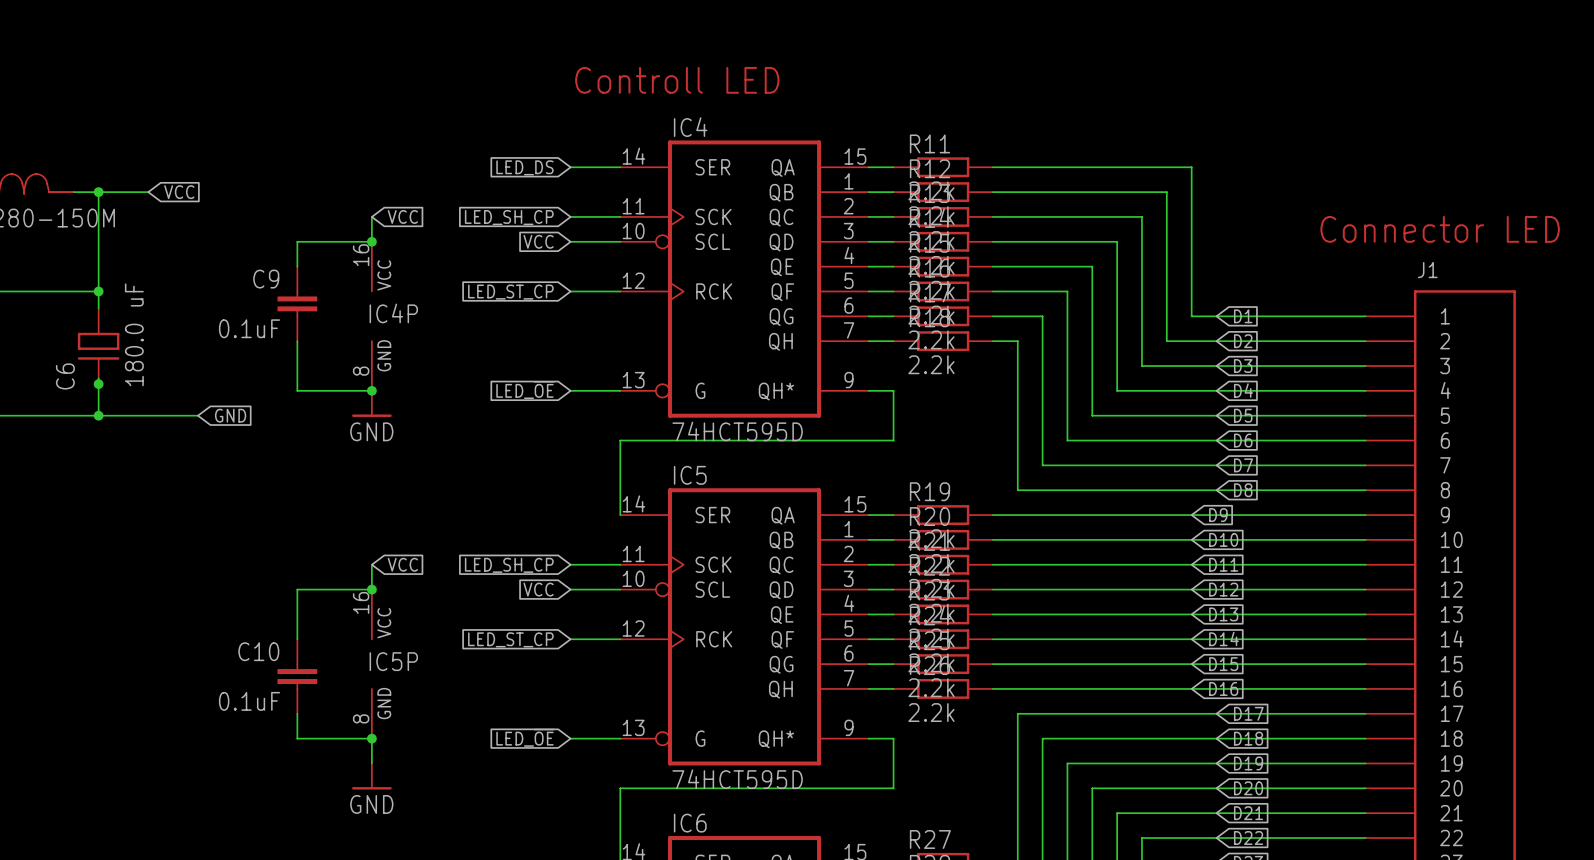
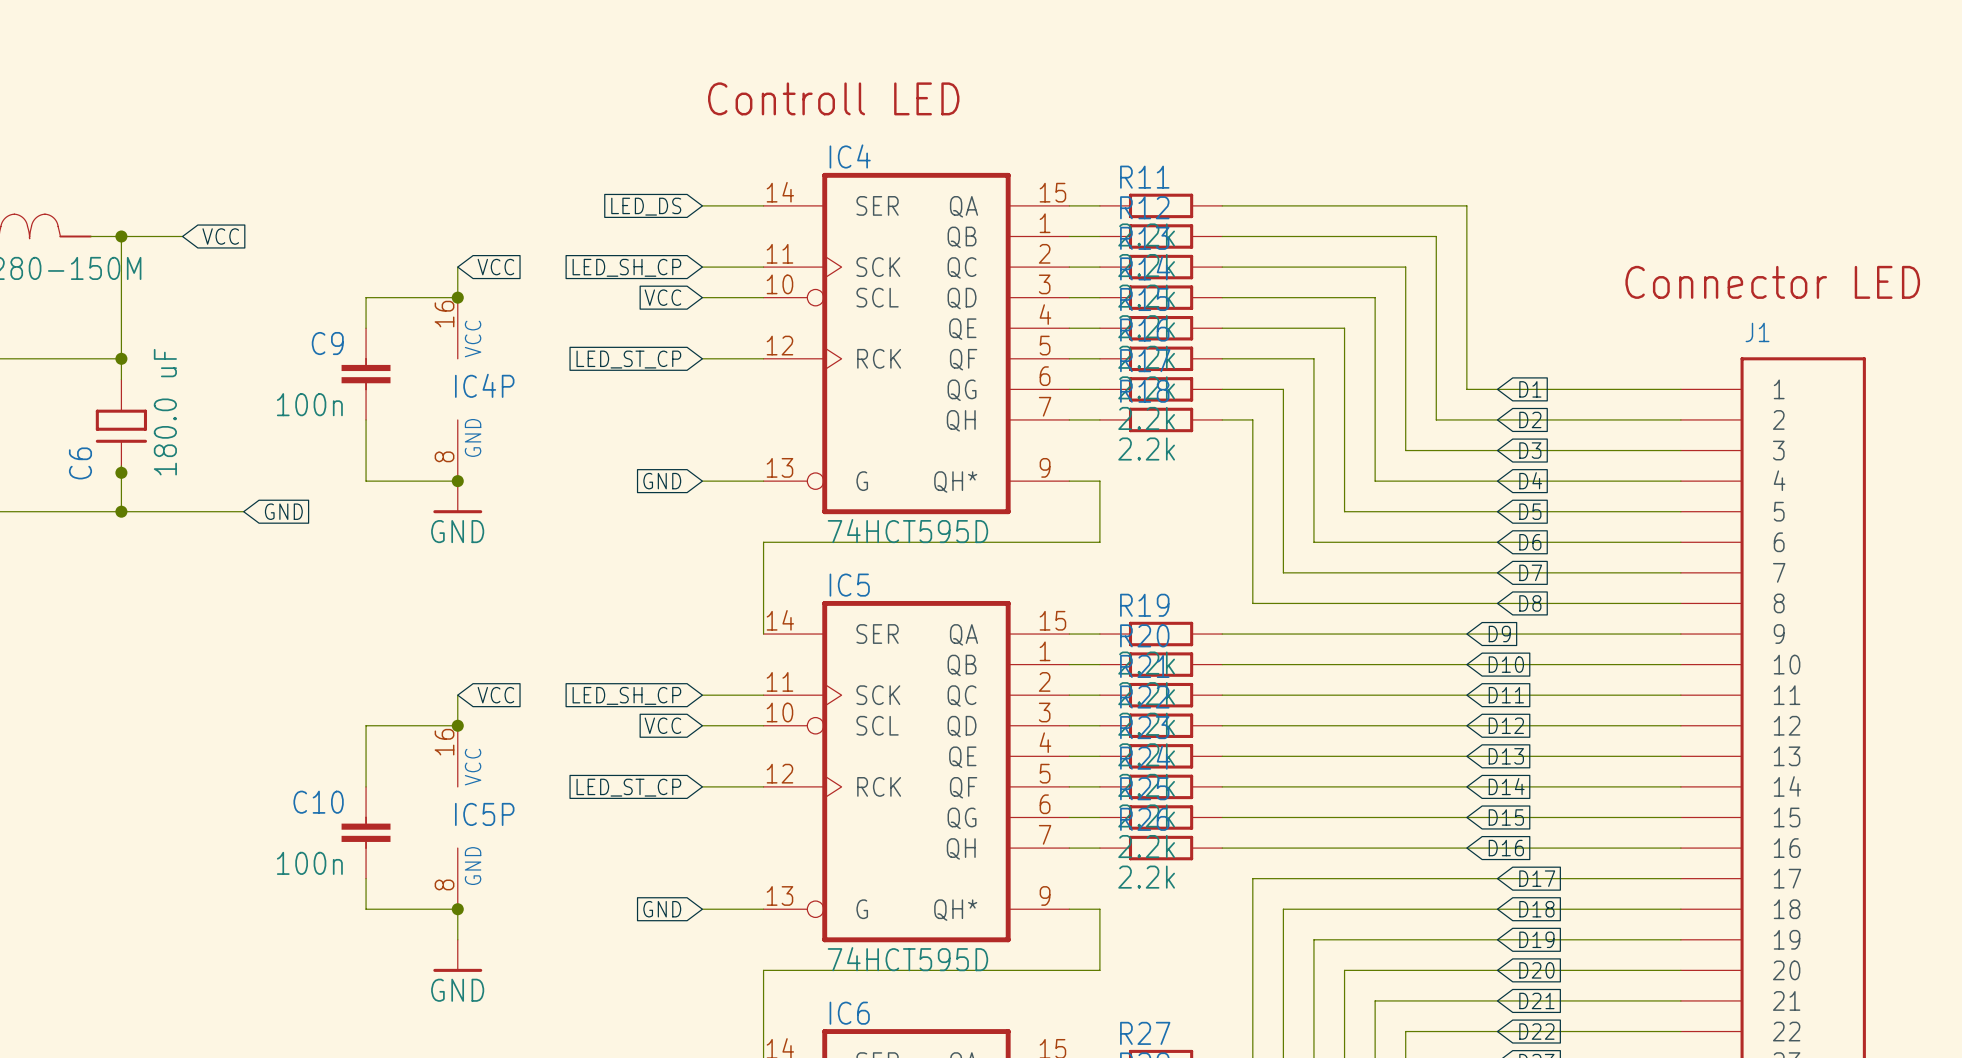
C9 value: 0.1uF (249, 328) -> 100n (309, 404)
global label: LED_~{OE} (525, 390) -> GND (662, 481)
C10 value: 0.1uF (249, 701) -> 100n (309, 863)
global label: LED_~{OE} (525, 737) -> GND (662, 909)

